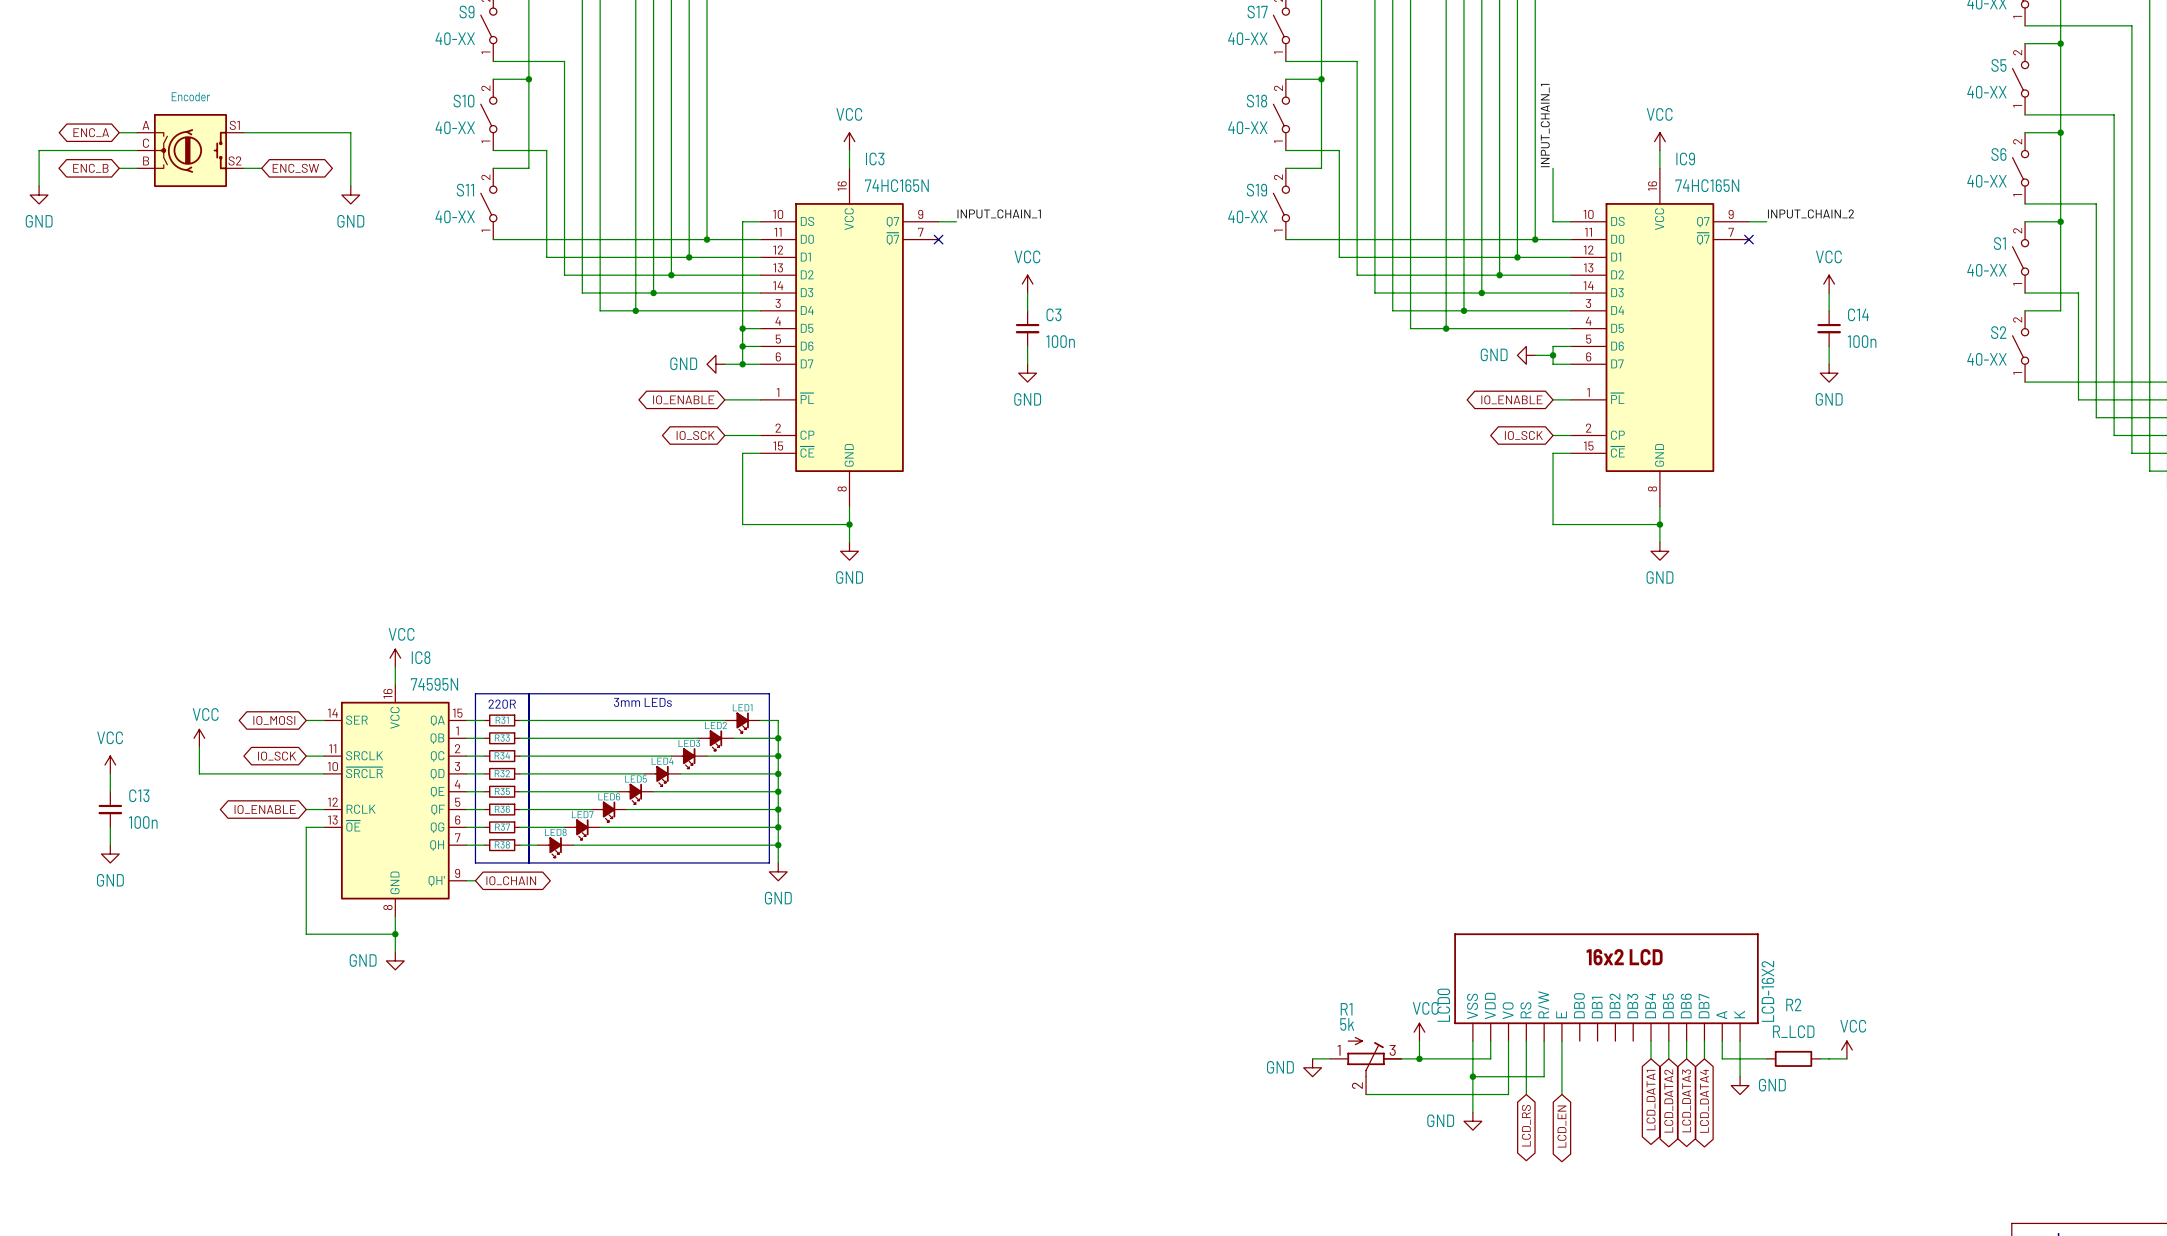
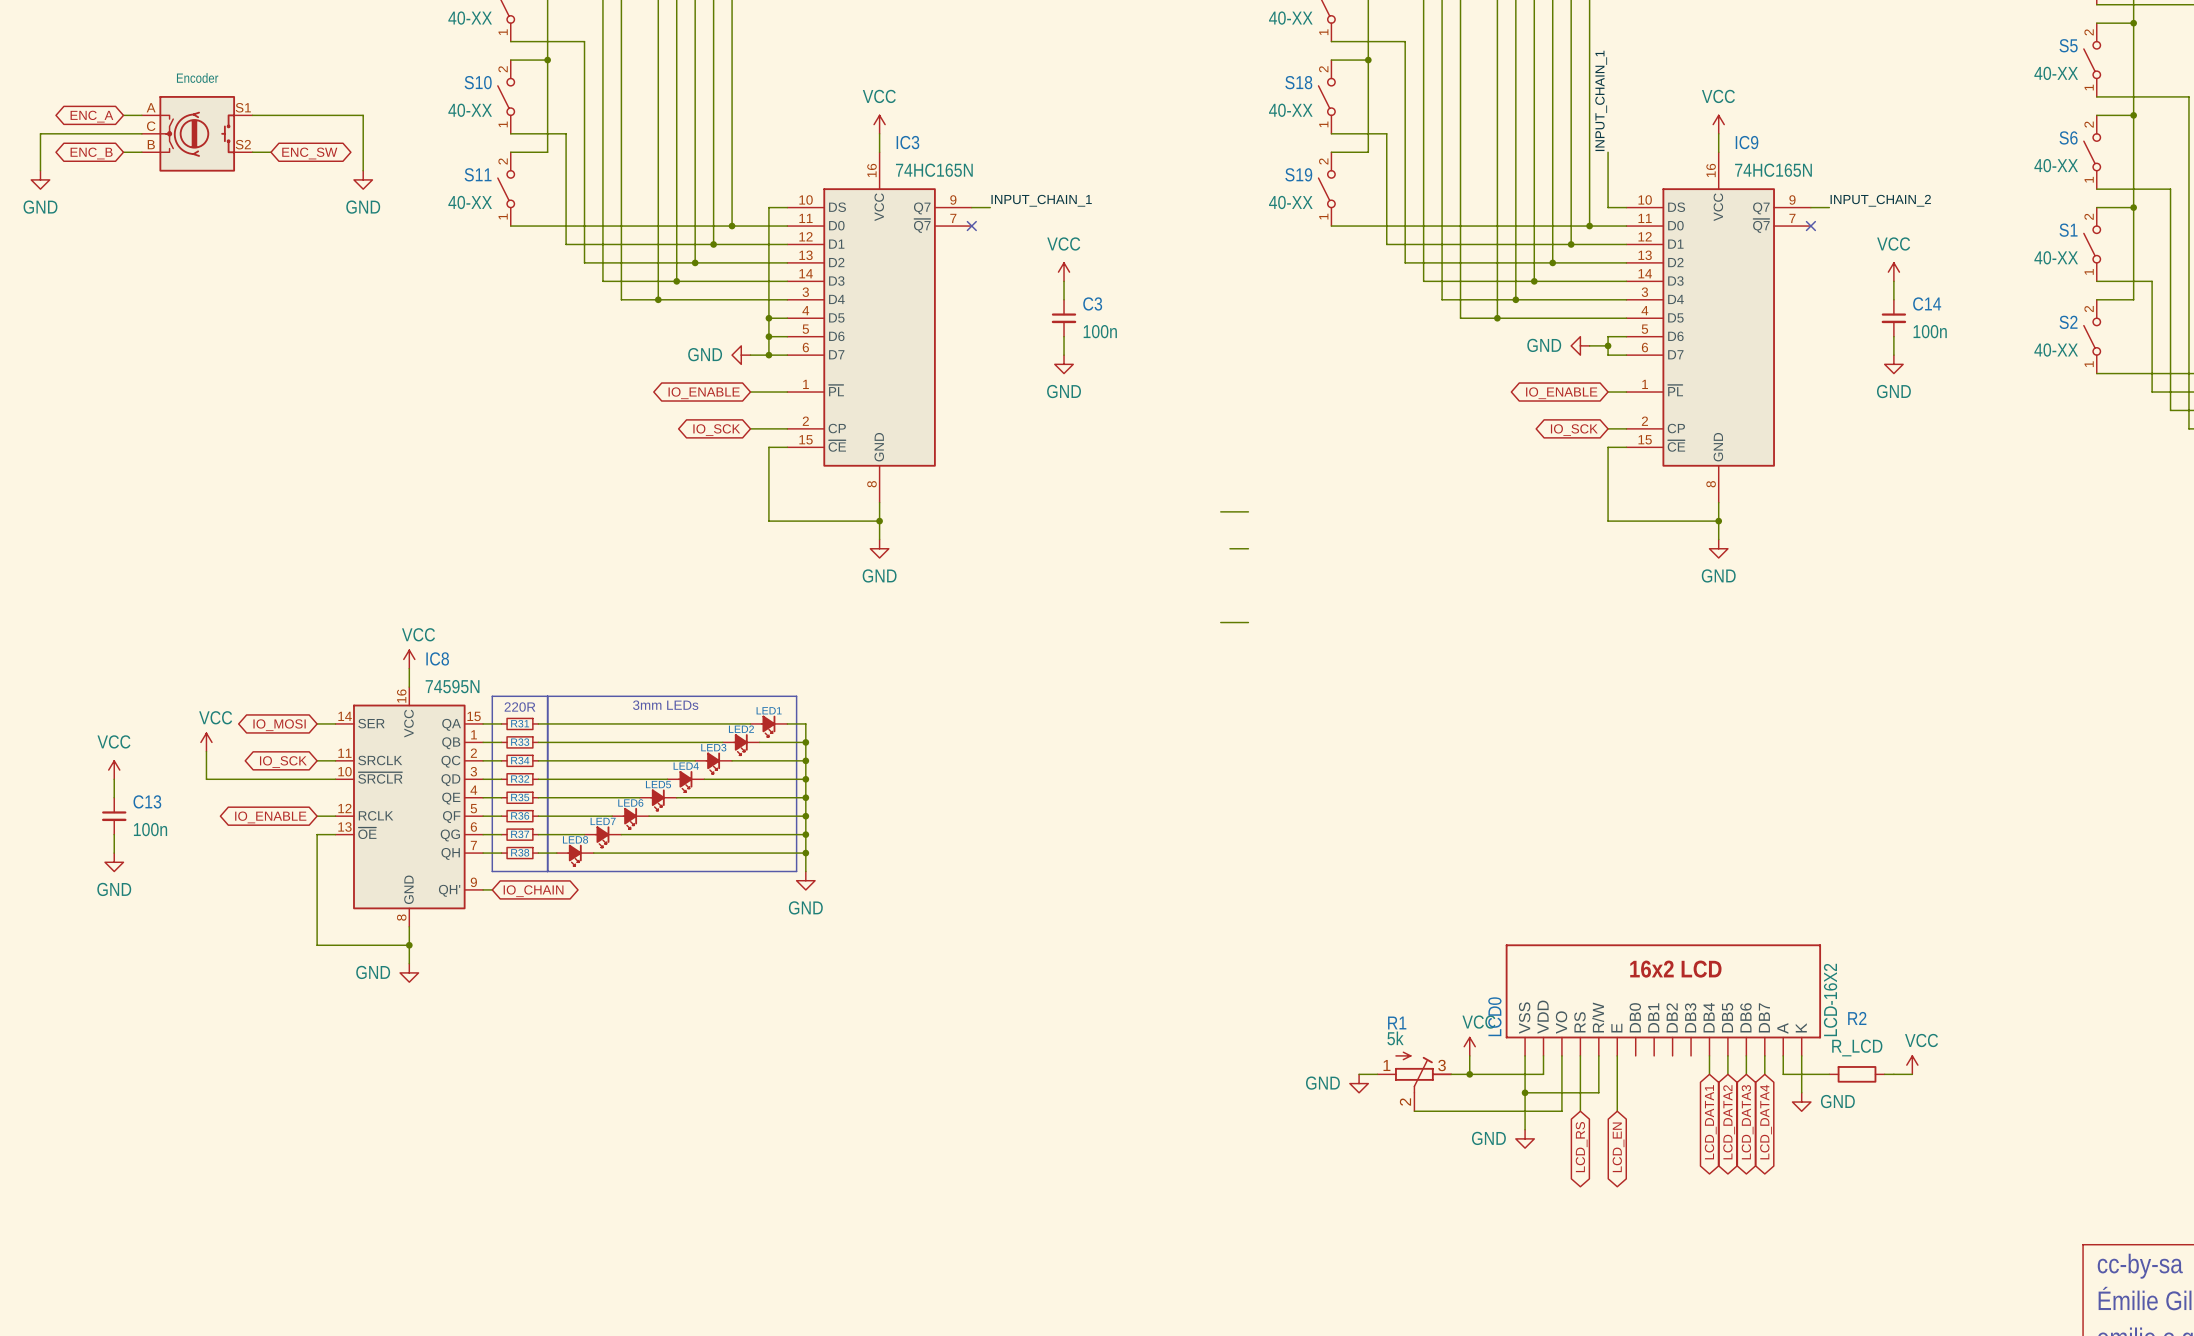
wire: none -> (1220, 511) (1248, 511)
wire: none -> (1229, 548) (1248, 548)
wire: none -> (1220, 622) (1248, 622)

